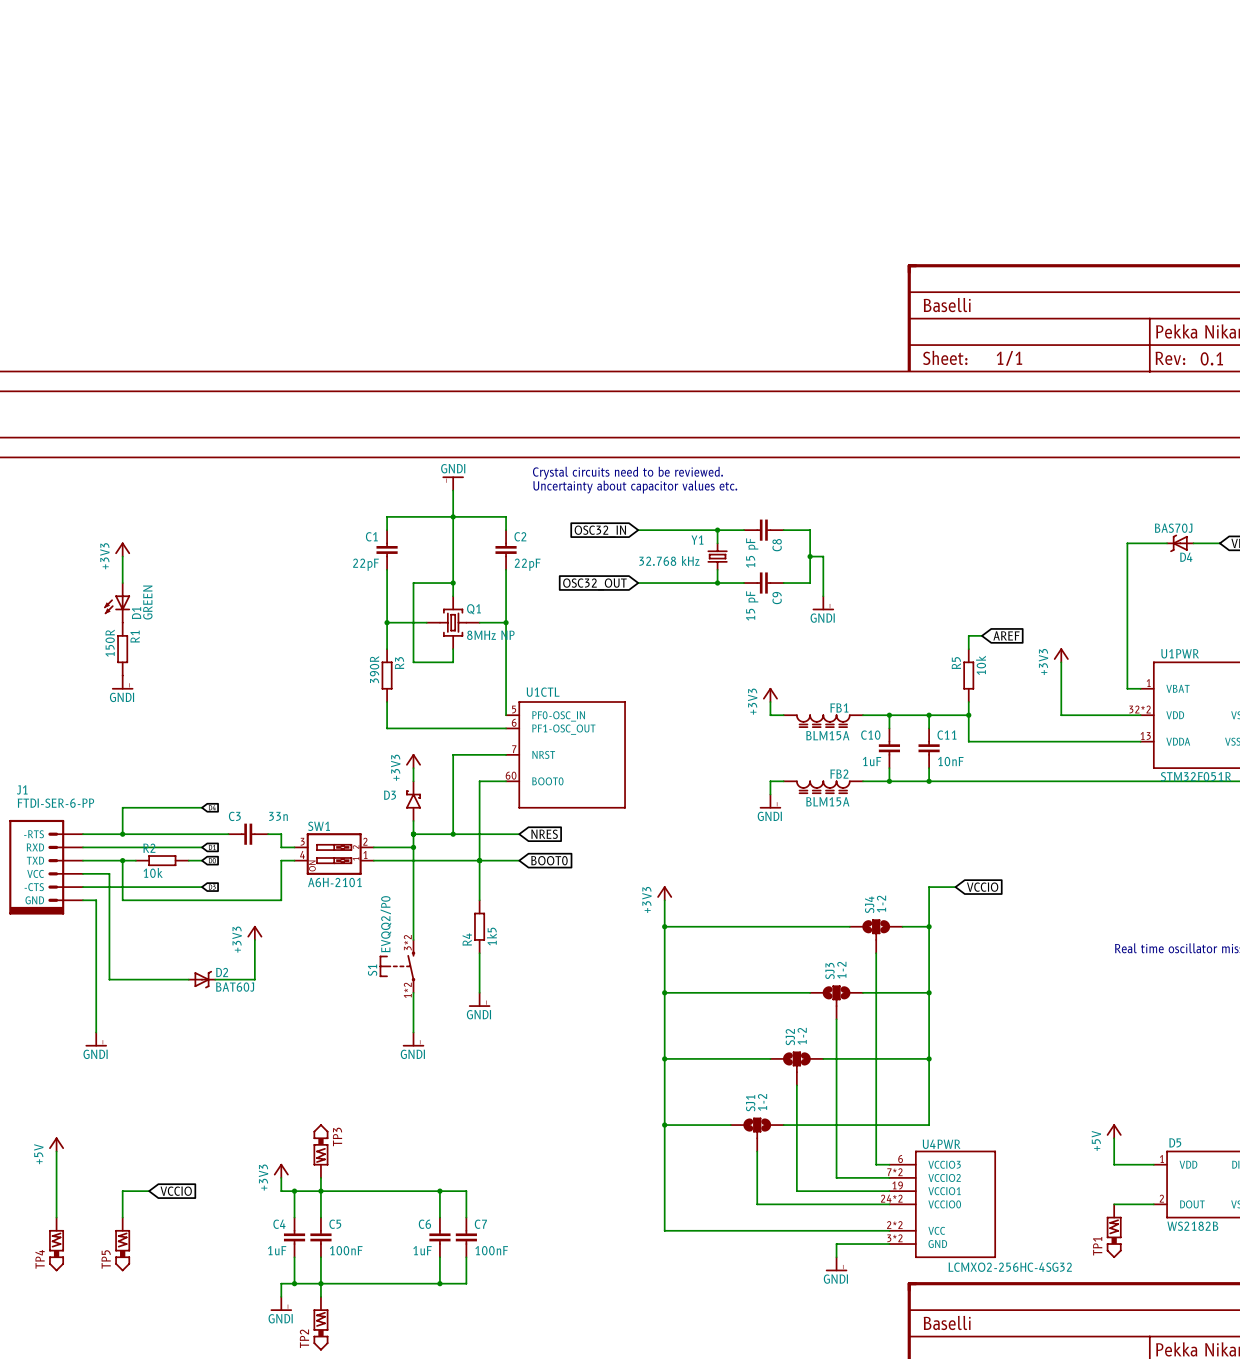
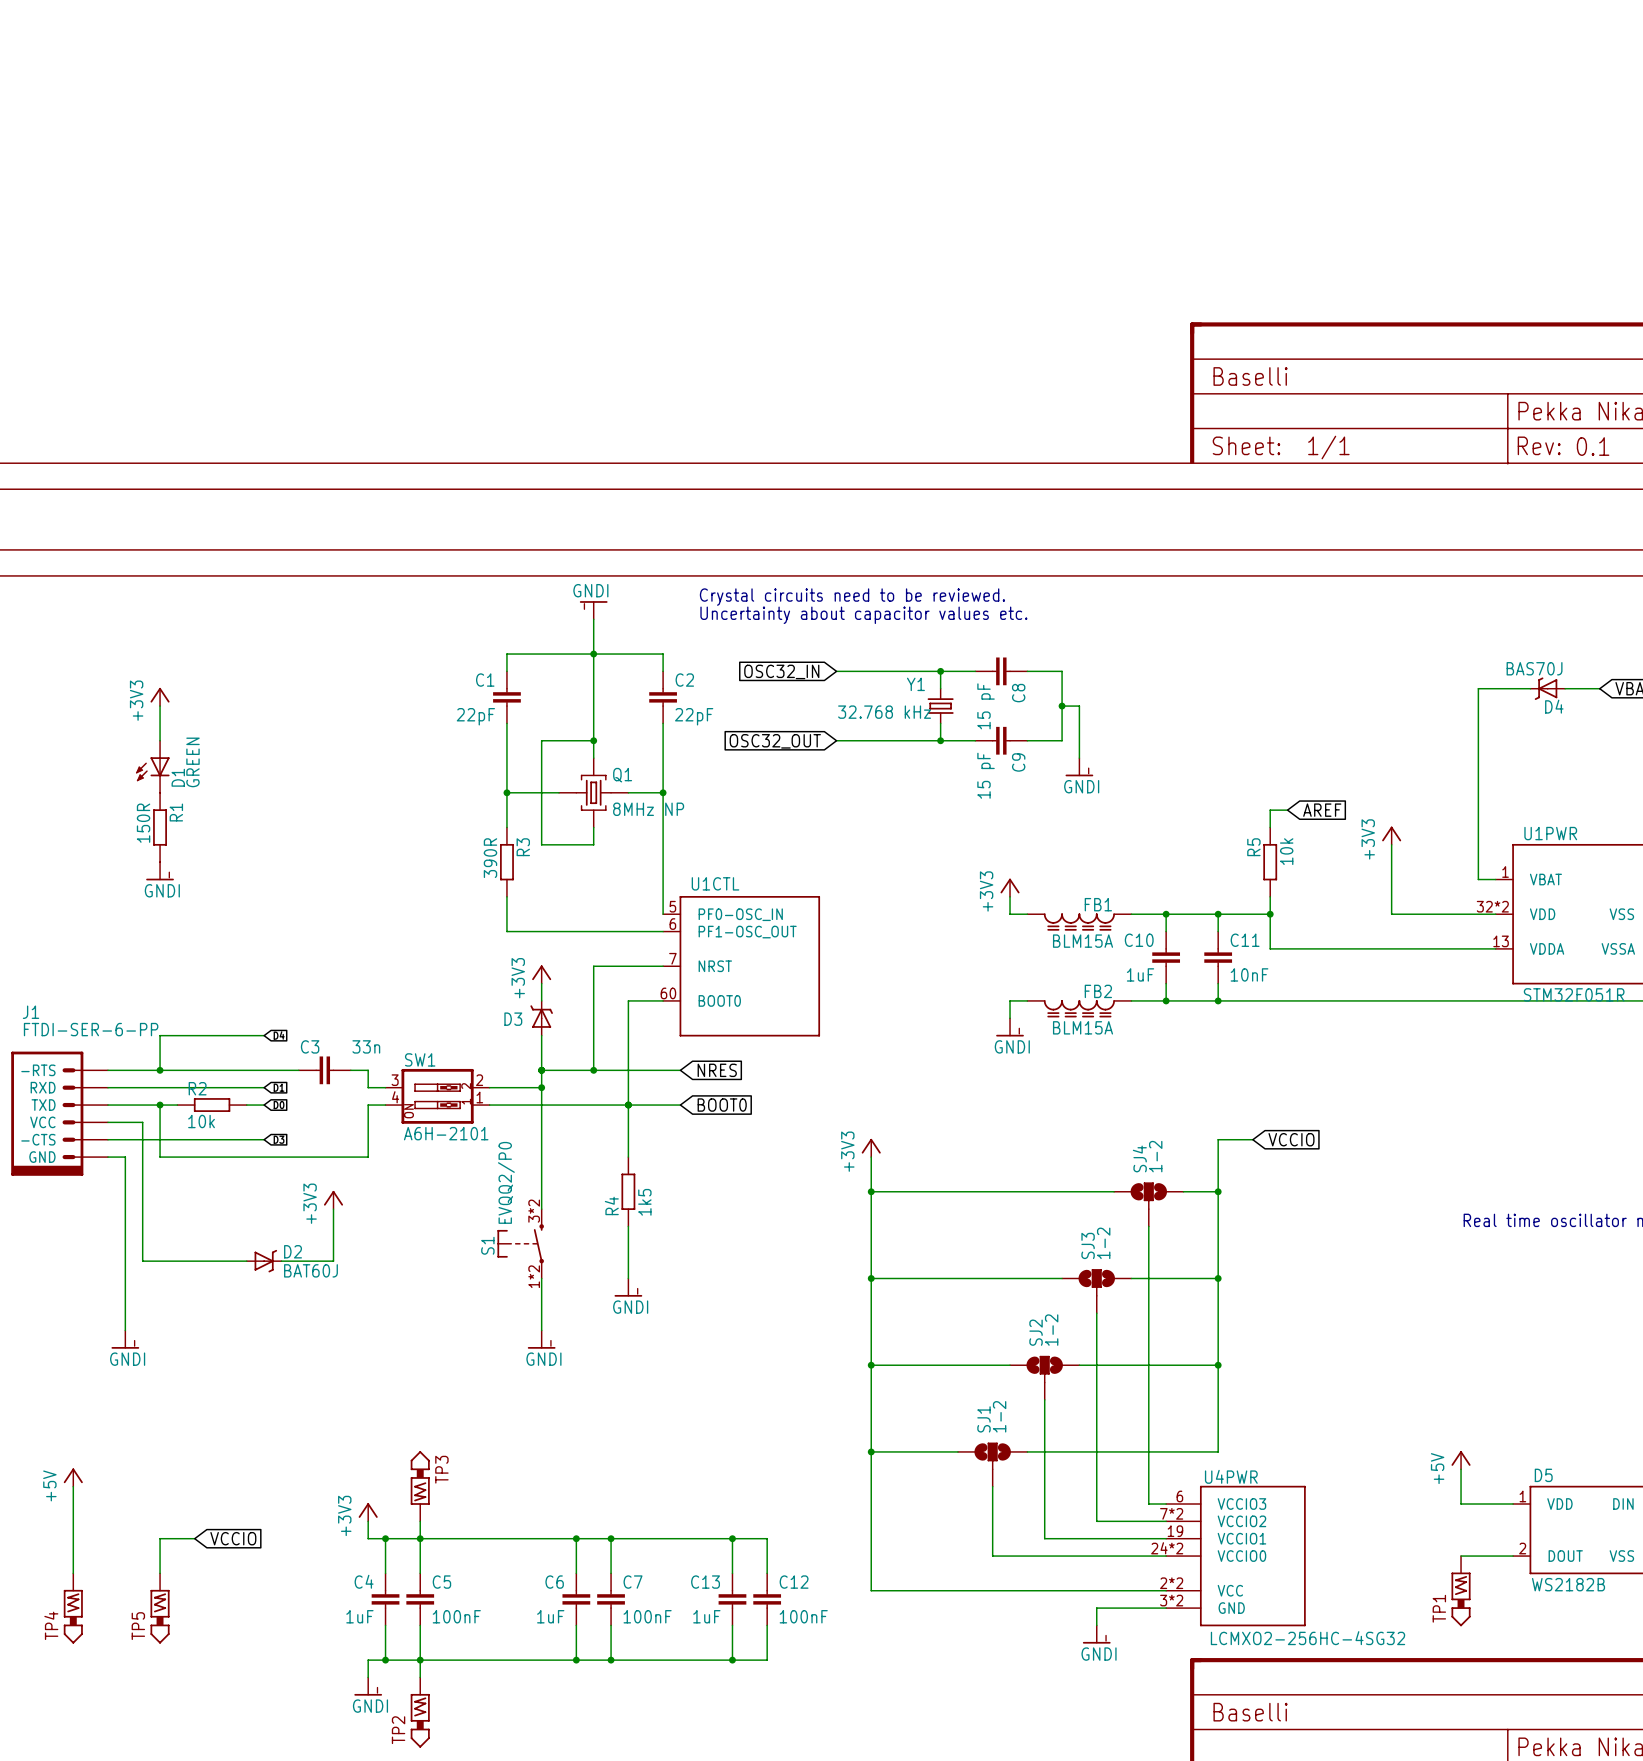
D3 symbol: [406, 781, 421, 821] -> [530, 1000, 553, 1036]
wire: none -> (611, 1538) (767, 1538) (767, 1573)
junction: none -> (611, 1538)
wire: none -> (732, 1538) (732, 1573)
junction: none -> (732, 1538)
C13: none -> 1uF (732, 1599)
C12: none -> 100nF (767, 1599)
wire: none -> (732, 1625) (732, 1660)
wire: none -> (767, 1625) (767, 1660) (611, 1660)
junction: none -> (611, 1660)
junction: none -> (732, 1660)

